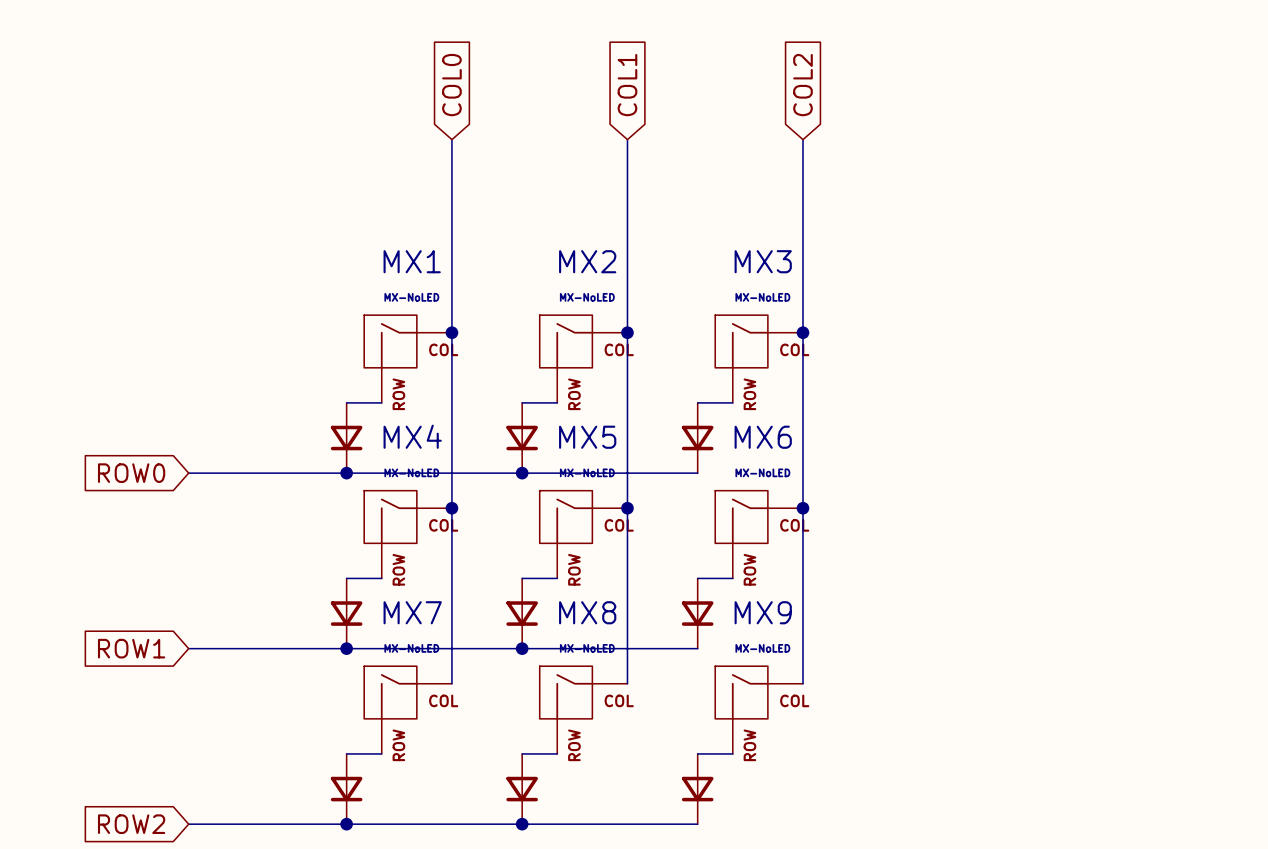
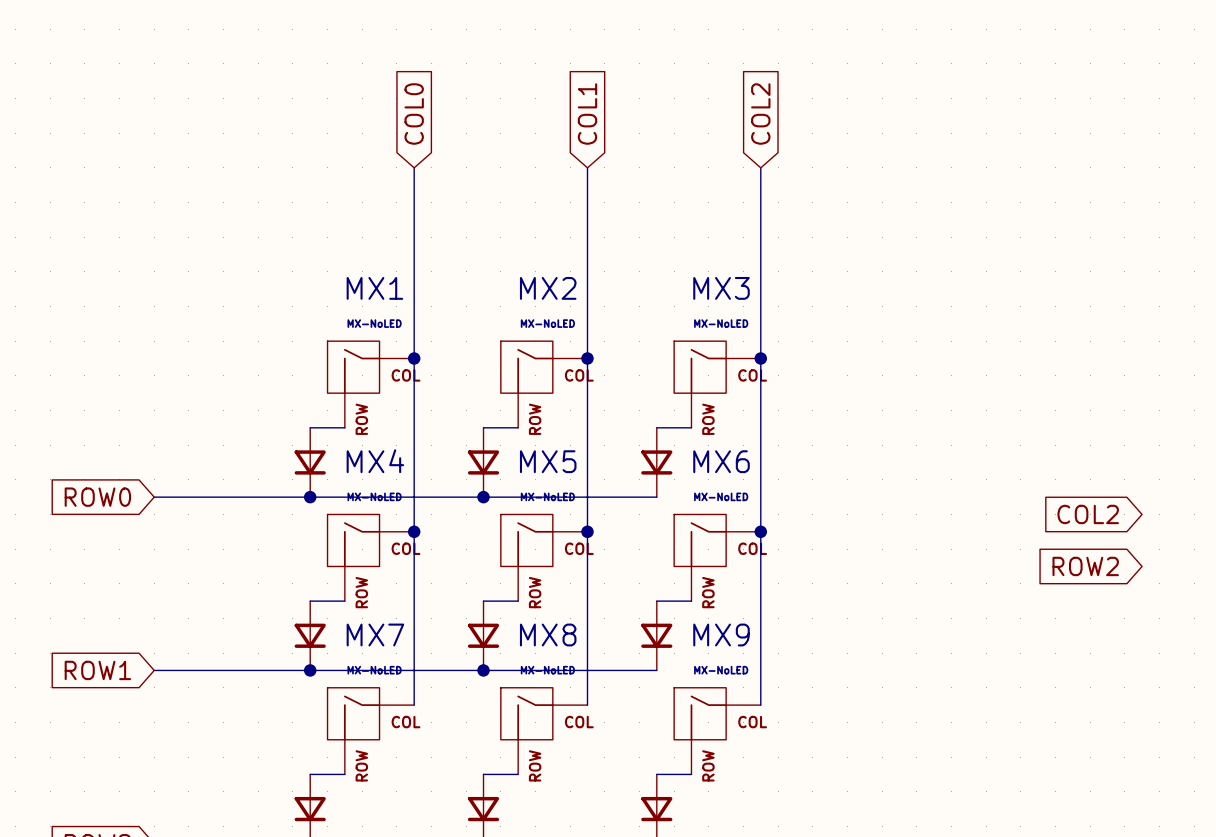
global label: none -> COL2 (1088, 514)
global label: none -> ROW2 (1085, 566)

